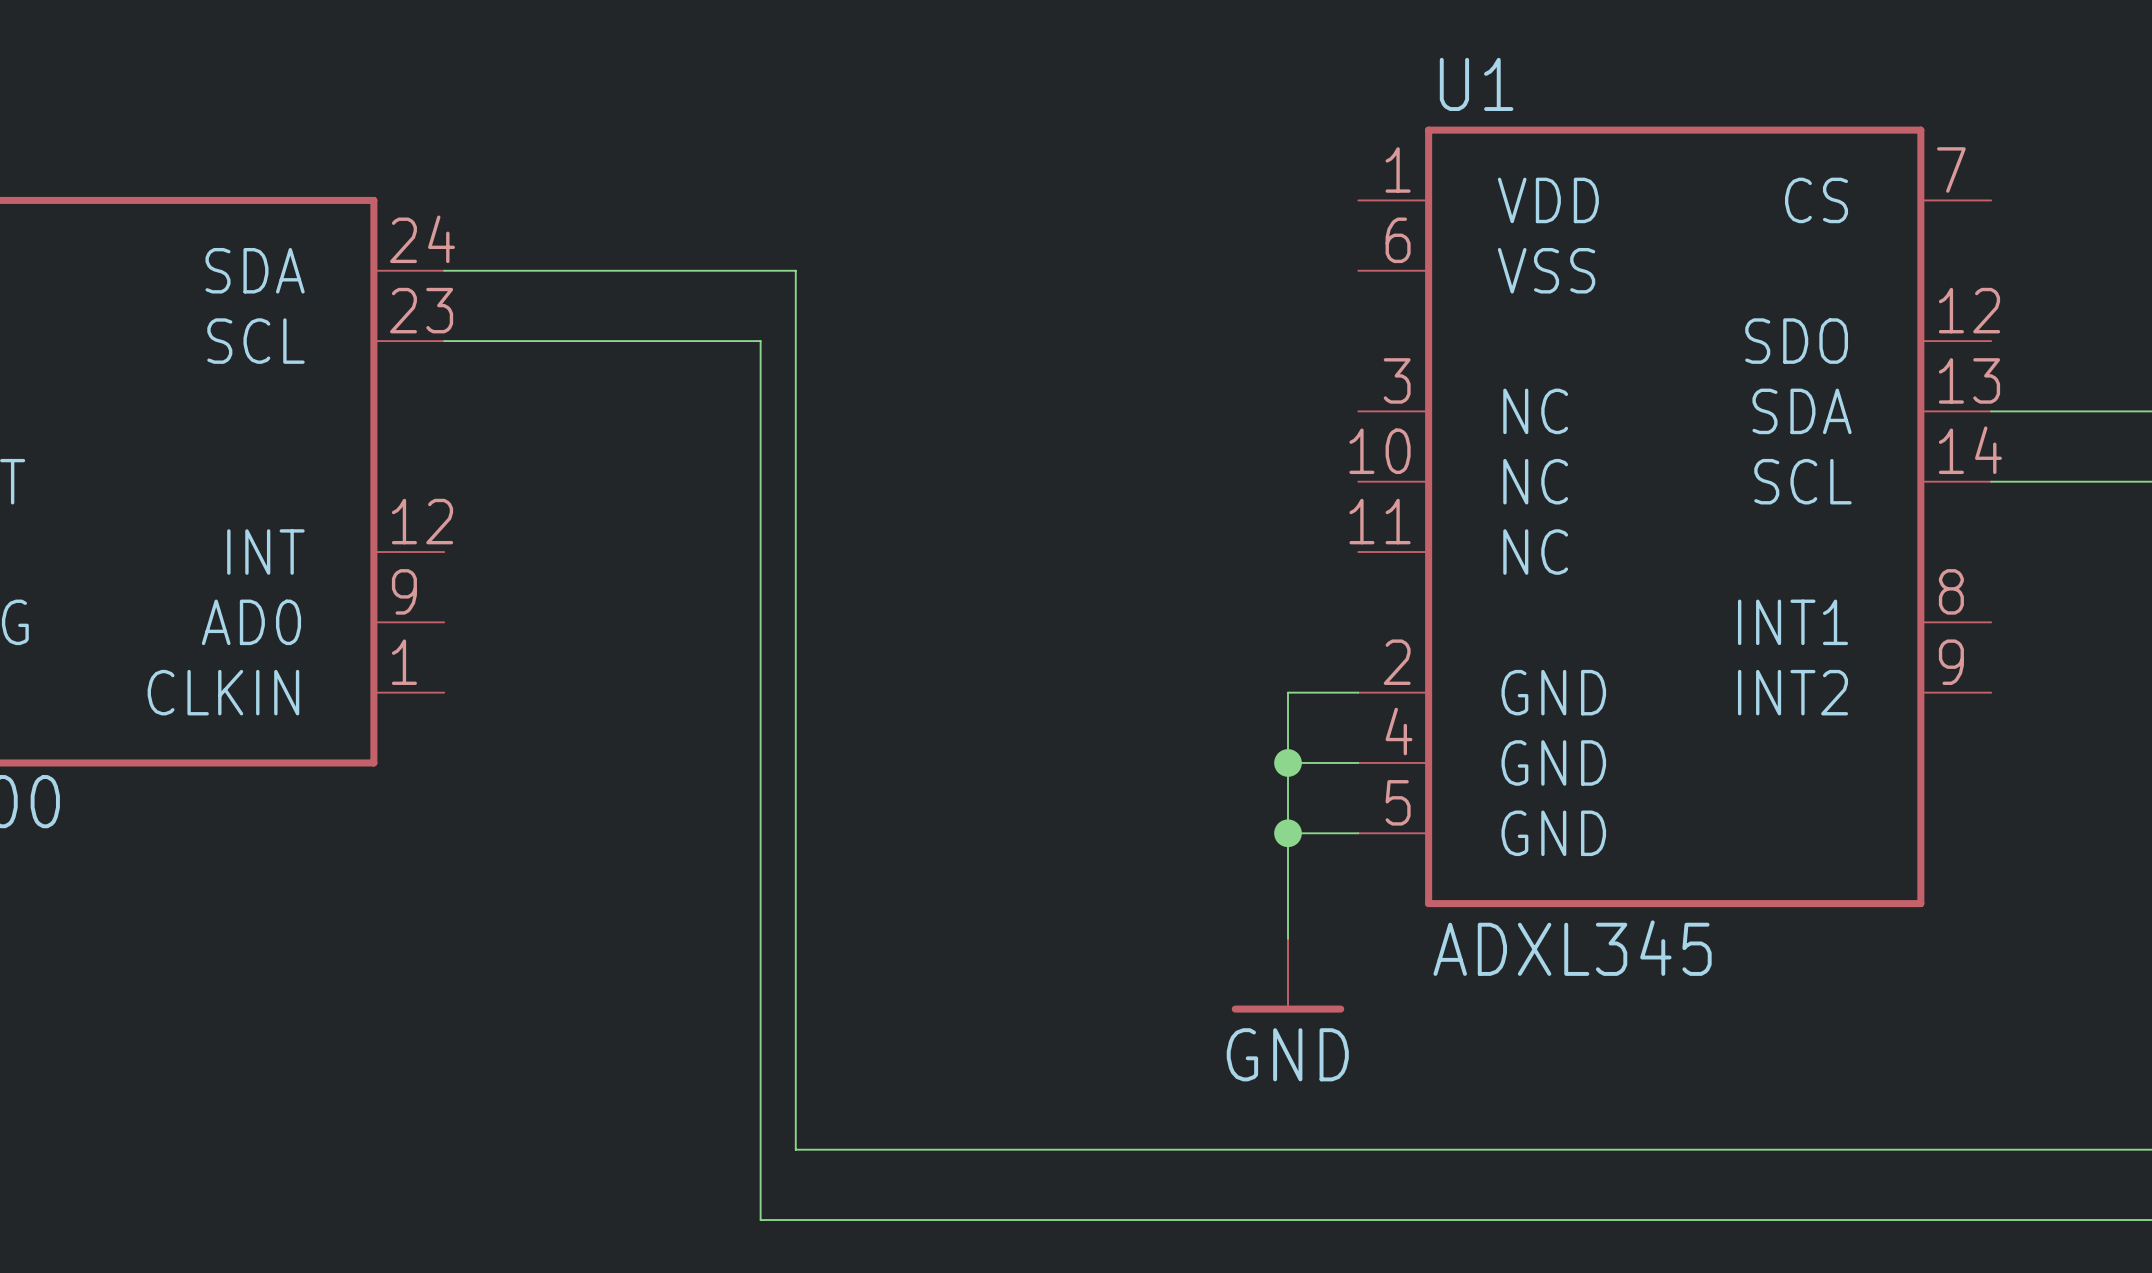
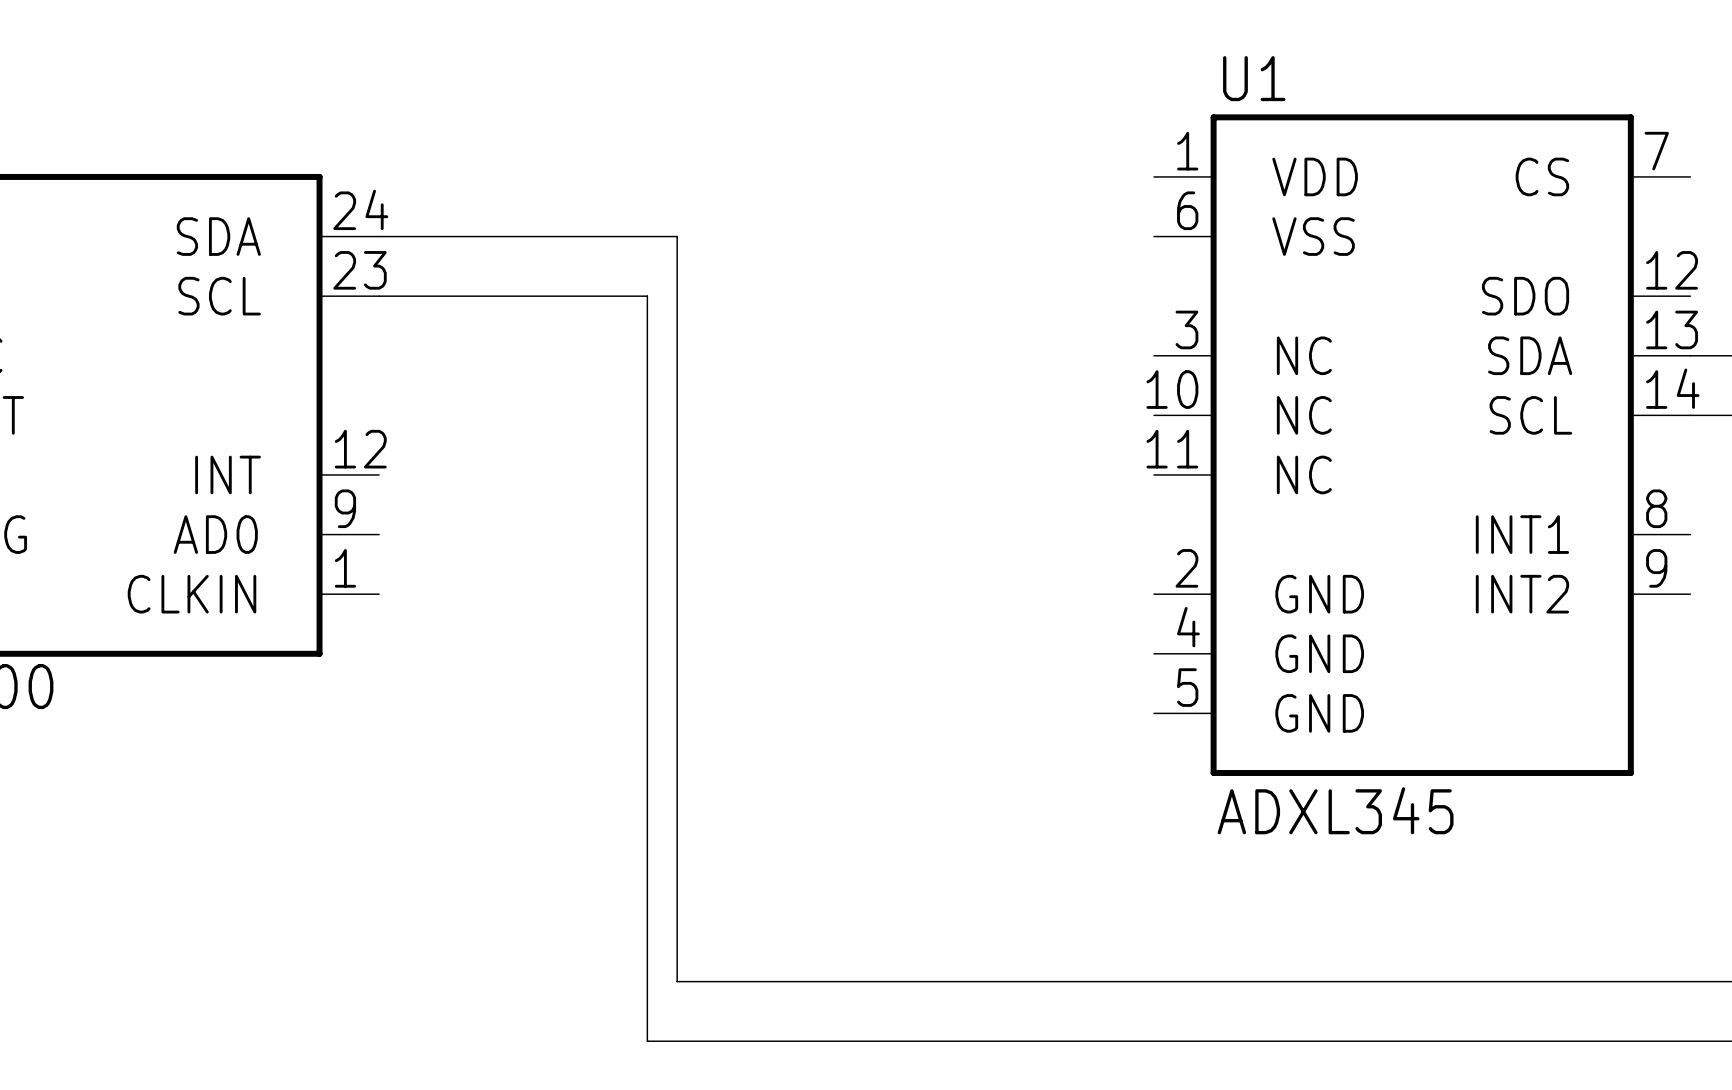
wire: (1358, 692) (1288, 692) (1288, 938) -> none
wire: (1288, 762) (1358, 762) -> none
junction: (1288, 762) -> none
wire: (1288, 833) (1358, 833) -> none
junction: (1288, 833) -> none
power symbol: GND (1288, 975) -> none

